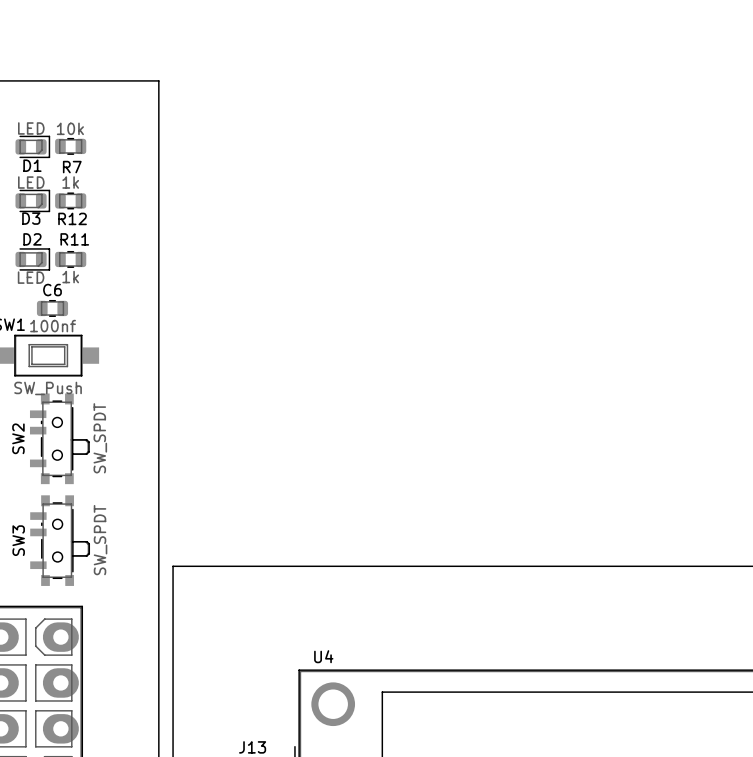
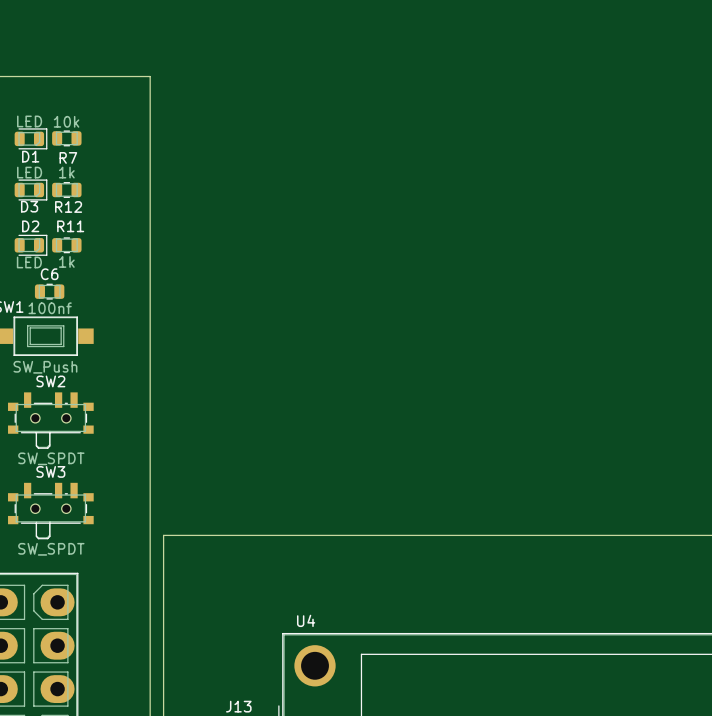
SW2 rotation: 0° (59, 438) -> 90° clockwise (50, 420)
SW3 rotation: 0° (60, 540) -> 90° clockwise (50, 511)

